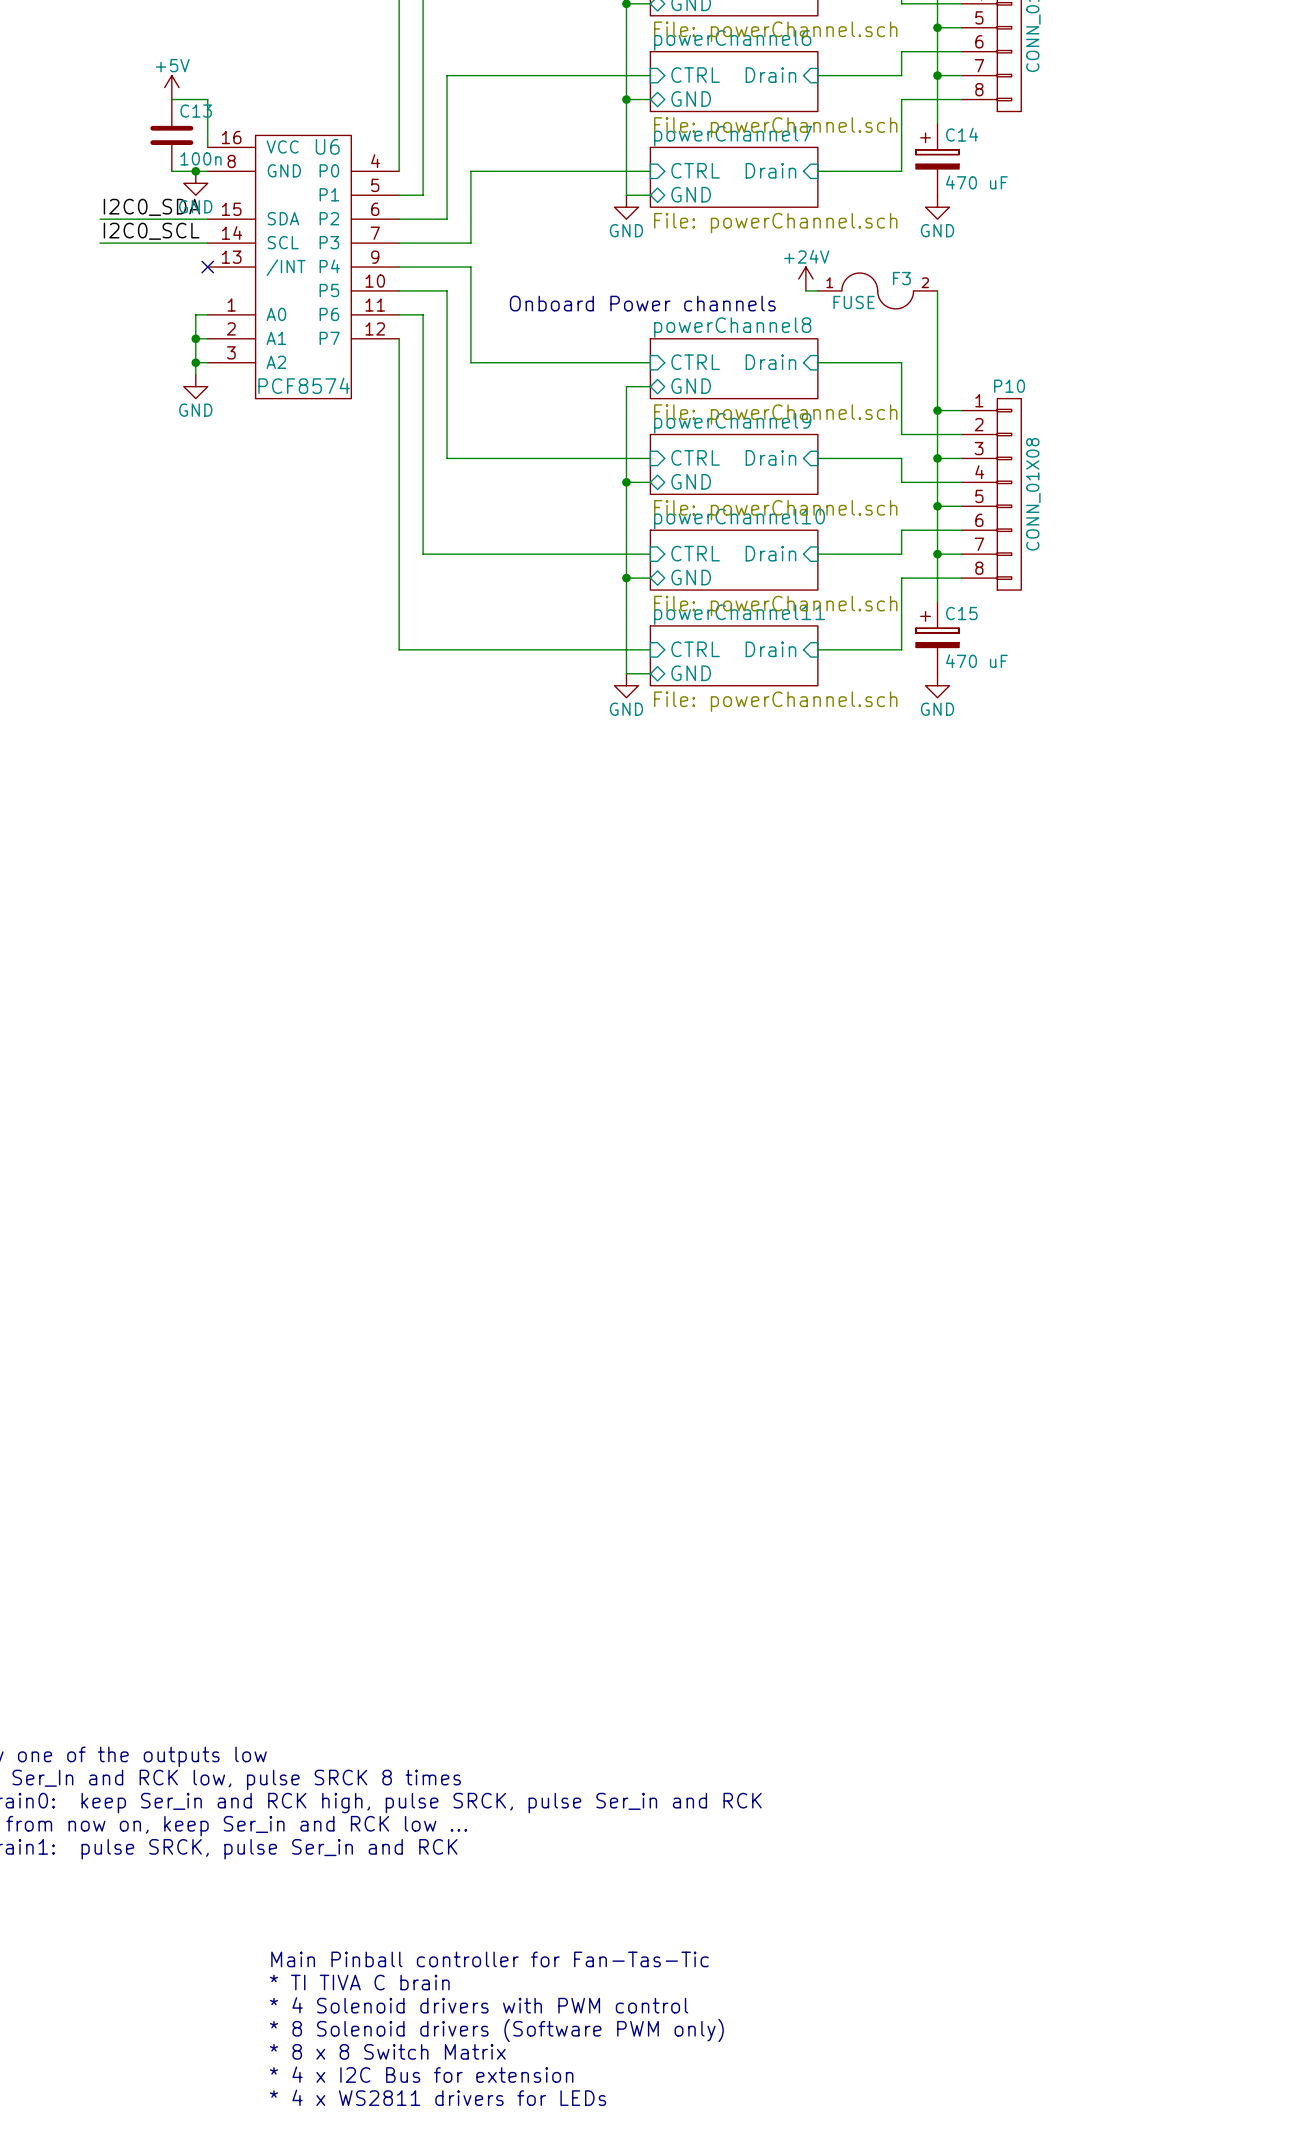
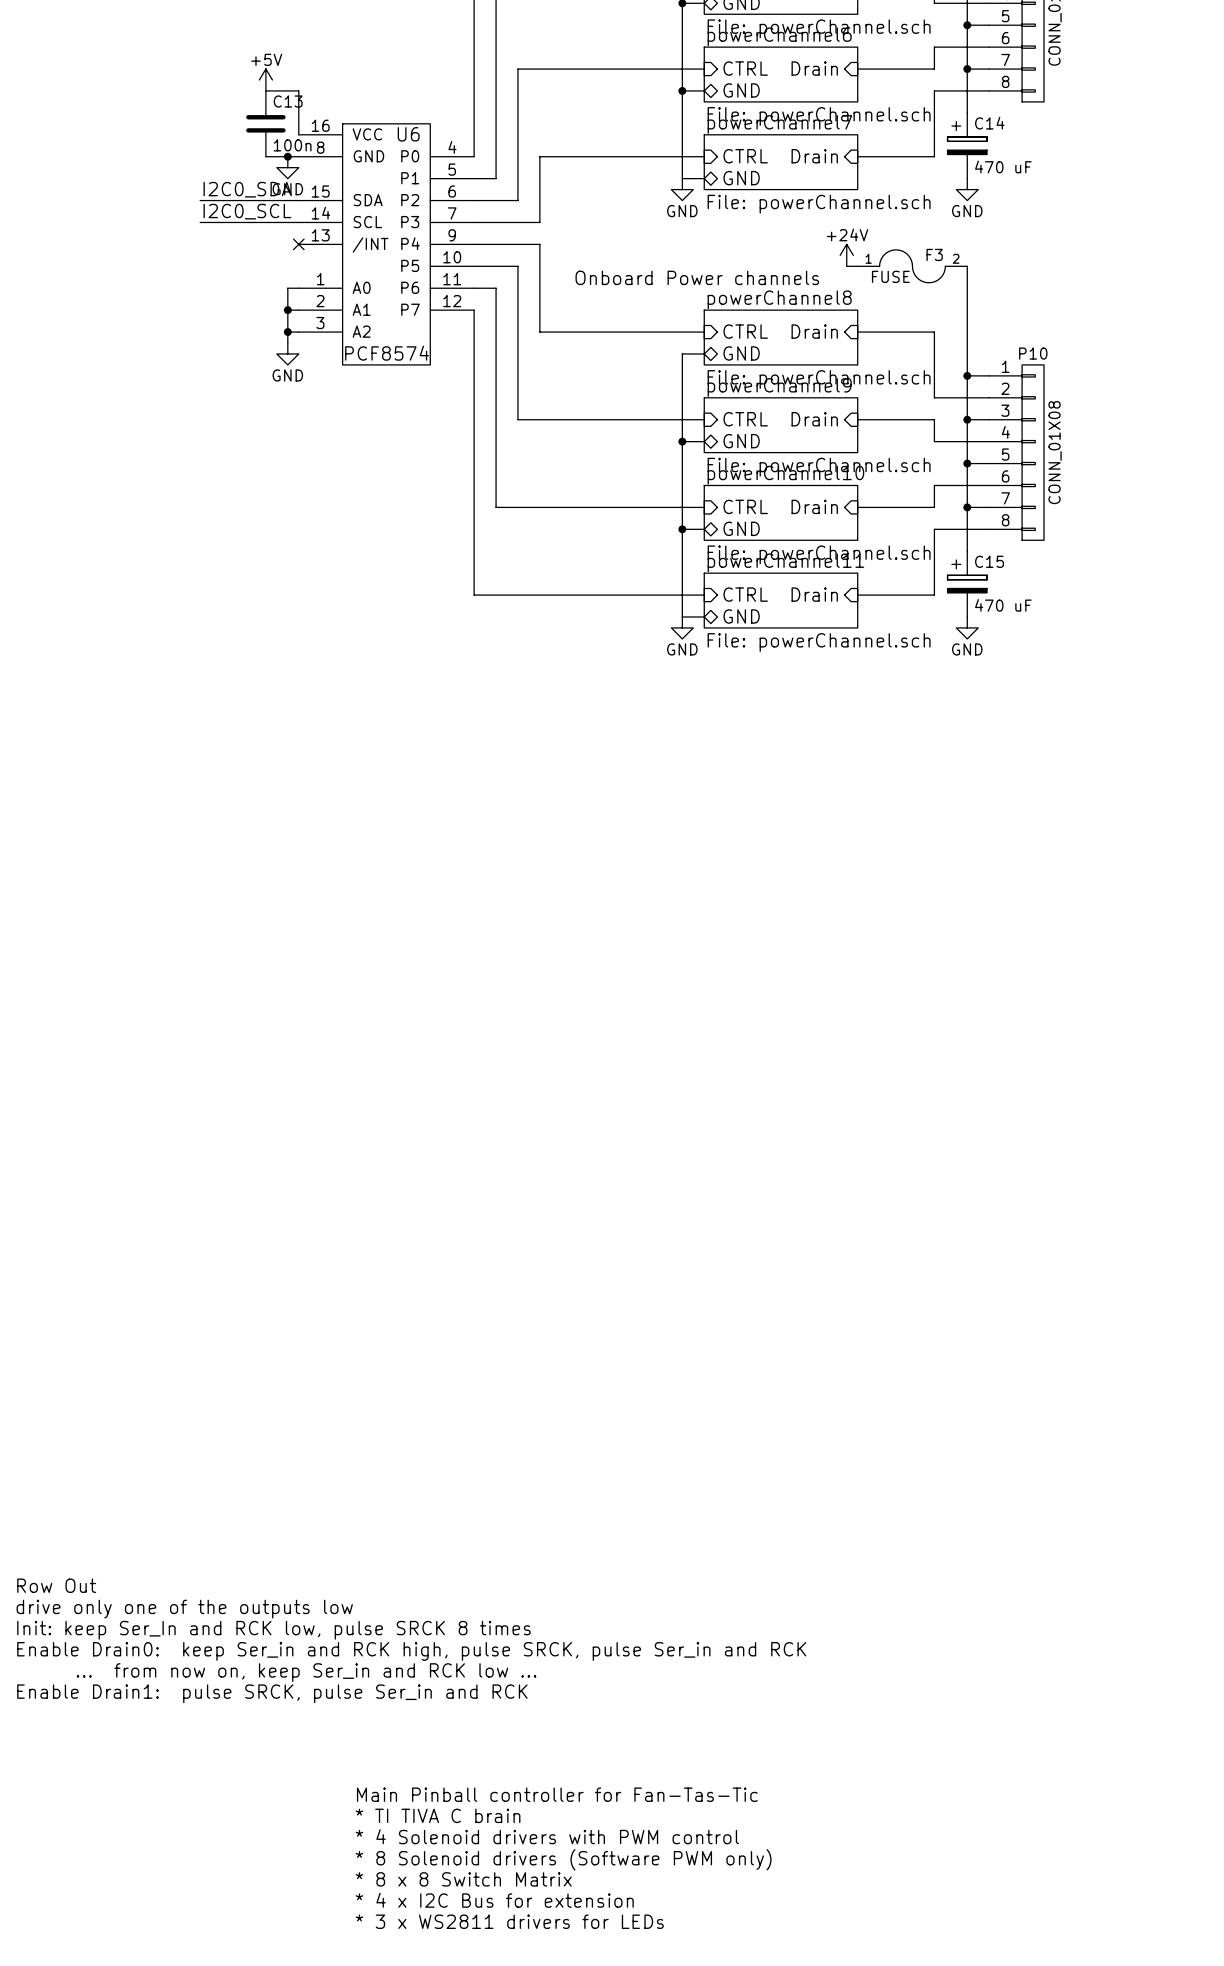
text: * 4 x WS2811 drivers for LEDs (438, 2097) -> * 3 x WS2811 drivers for LEDs (509, 1921)

